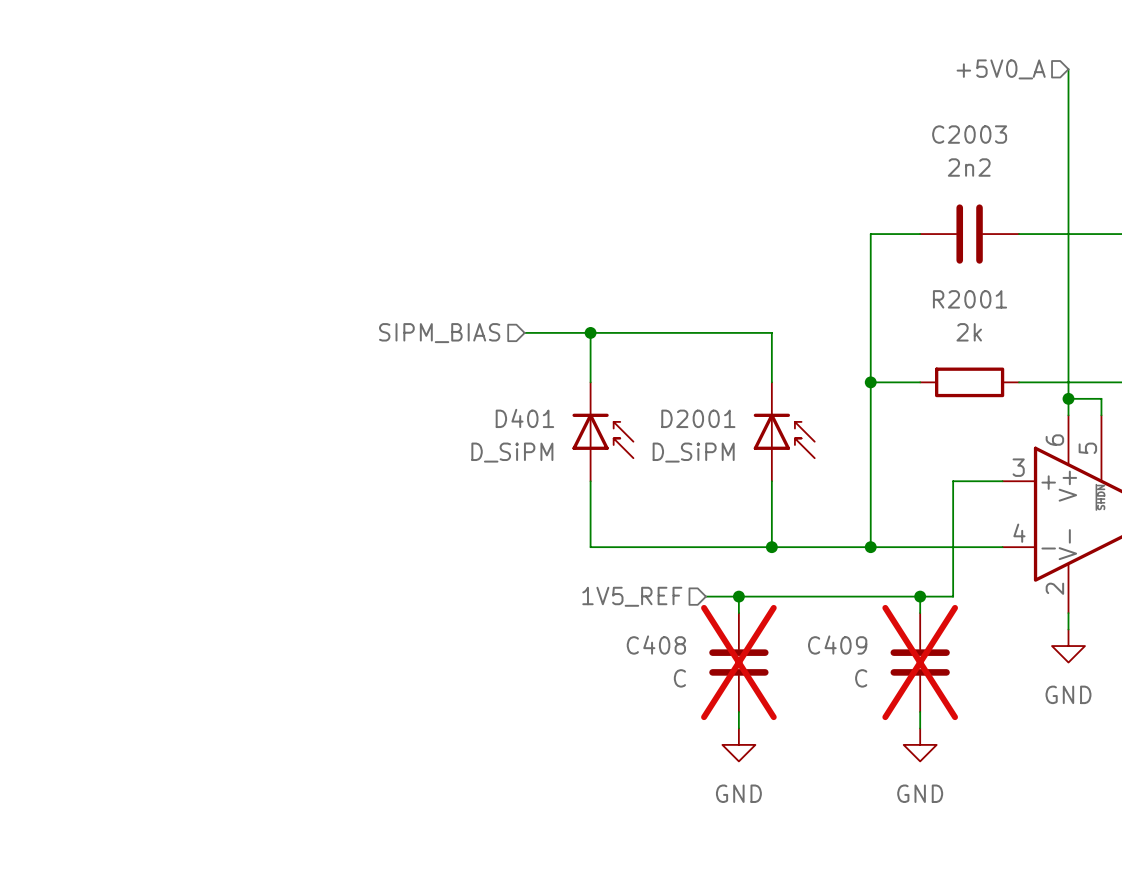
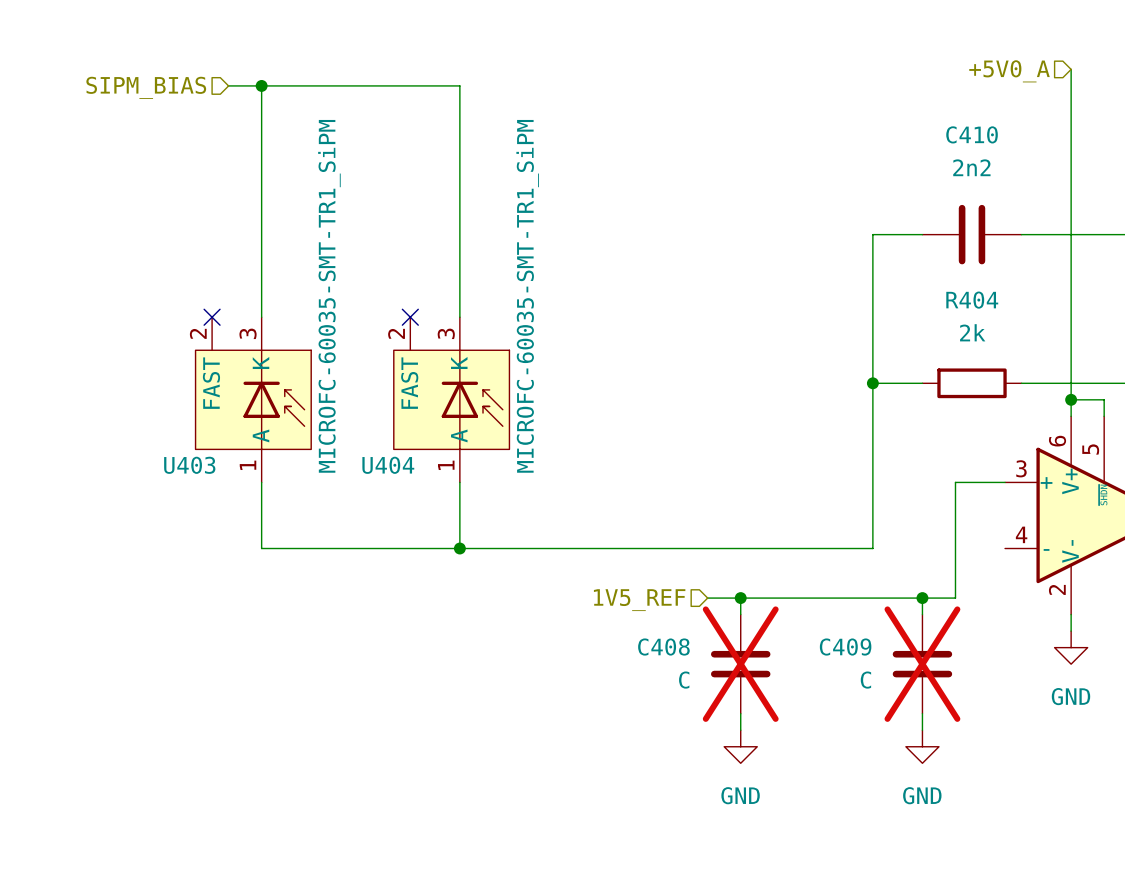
hierarchical label: none -> SIPM_BIAS (146, 87)
wire: none -> (228, 85) (459, 85) (459, 317)
wire: none -> (261, 85) (261, 317)
junction: none -> (261, 85)
C2003 name: C2003 (969, 134) -> C410 (972, 134)
R2001 name: R2001 (970, 299) -> R404 (972, 300)
no-connect mark: none -> (212, 317)
no-connect mark: none -> (410, 317)
wire: (524, 332) (771, 332) (771, 382) -> none
wire: (590, 332) (590, 382) -> none
junction: (590, 332) -> none
hierarchical label: SIPM_BIAS (439, 333) -> none
U403: none -> MICROFC-60035-SMT-TR1_SiPM (253, 399)
U404: none -> MICROFC-60035-SMT-TR1_SiPM (451, 399)
D401: D_SiPM (602, 431) -> none
D2001: D_SiPM (784, 431) -> none
wire: (590, 481) (590, 547) -> (261, 482) (261, 548) (592, 548)
wire: (771, 481) (771, 547) -> (459, 482) (459, 548)
junction: none -> (459, 548)
junction: (771, 547) -> none
wire: (870, 547) (1002, 547) -> none
junction: (870, 547) -> none

